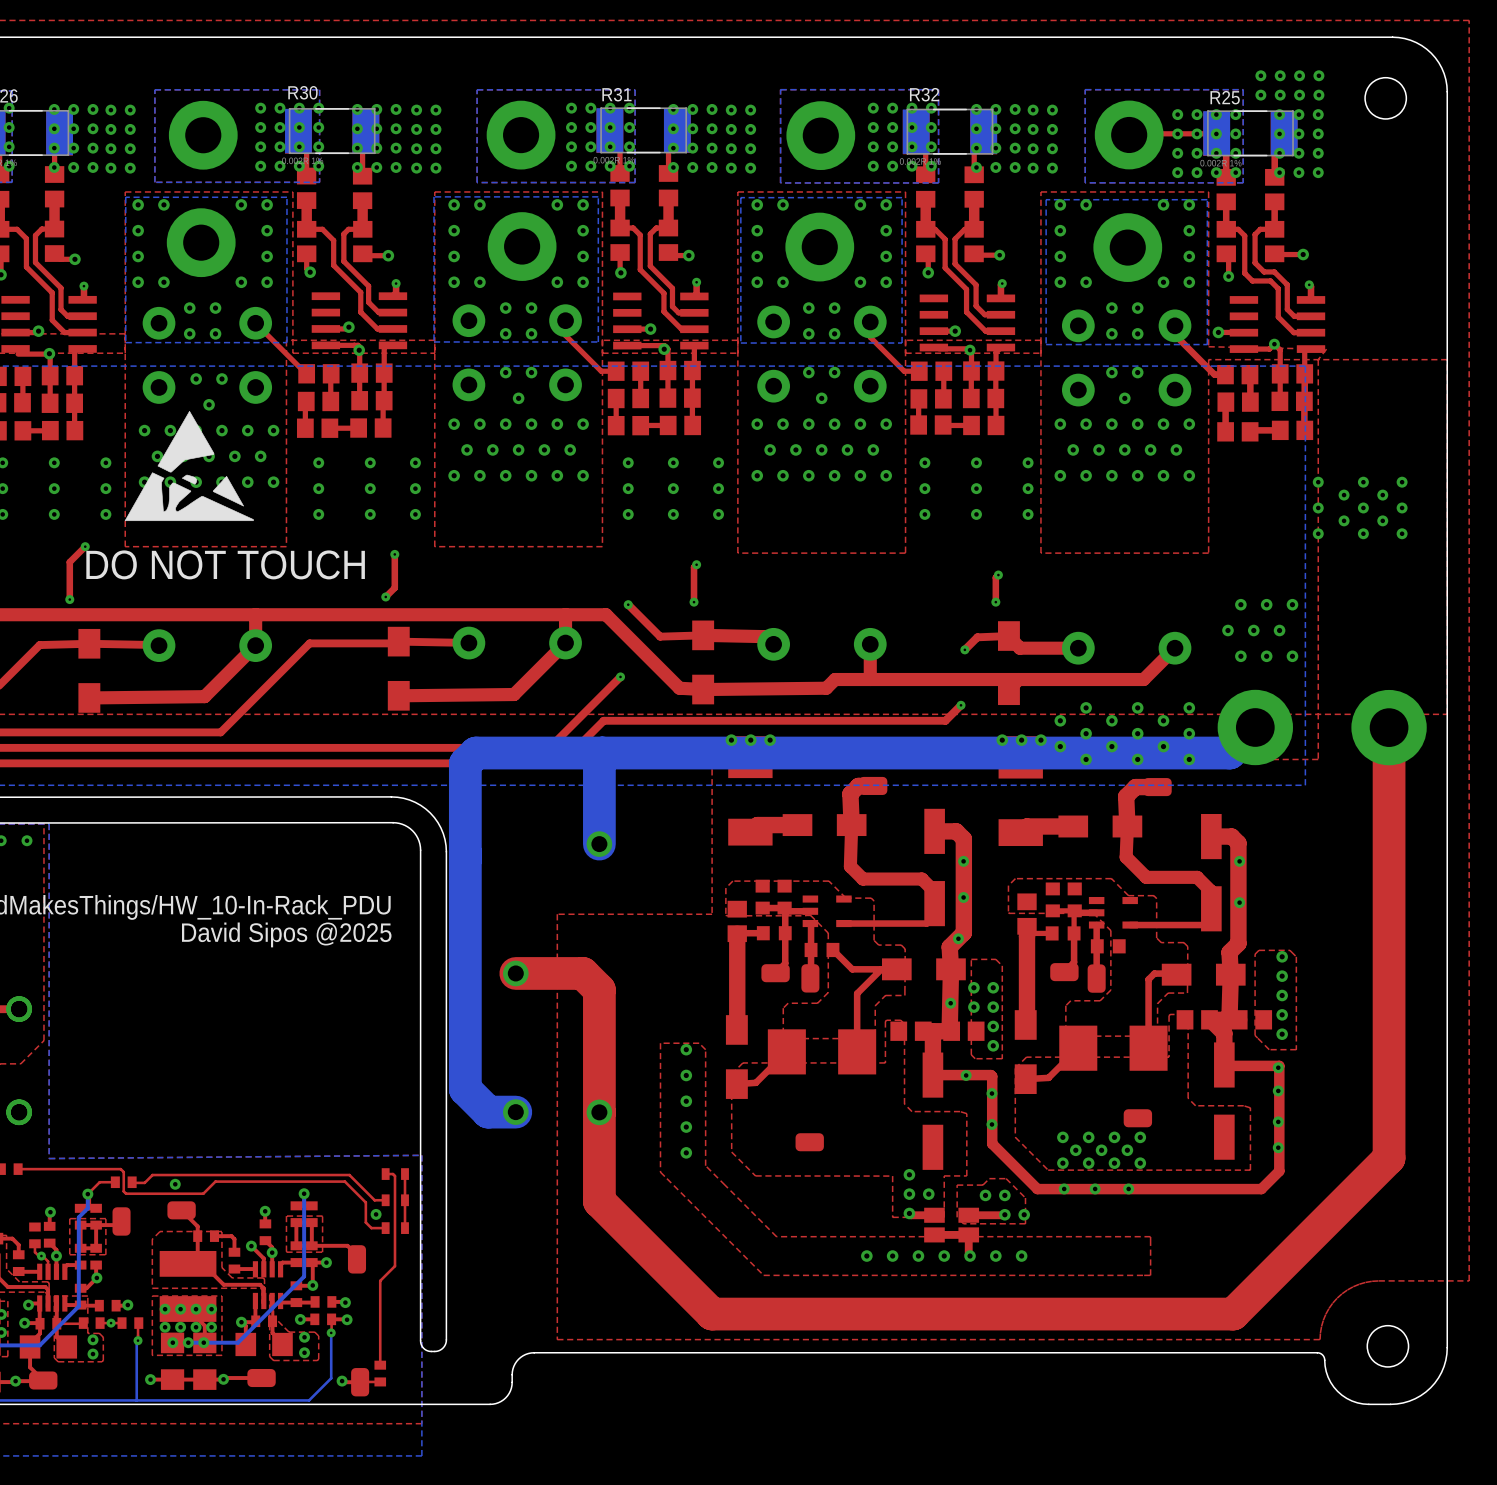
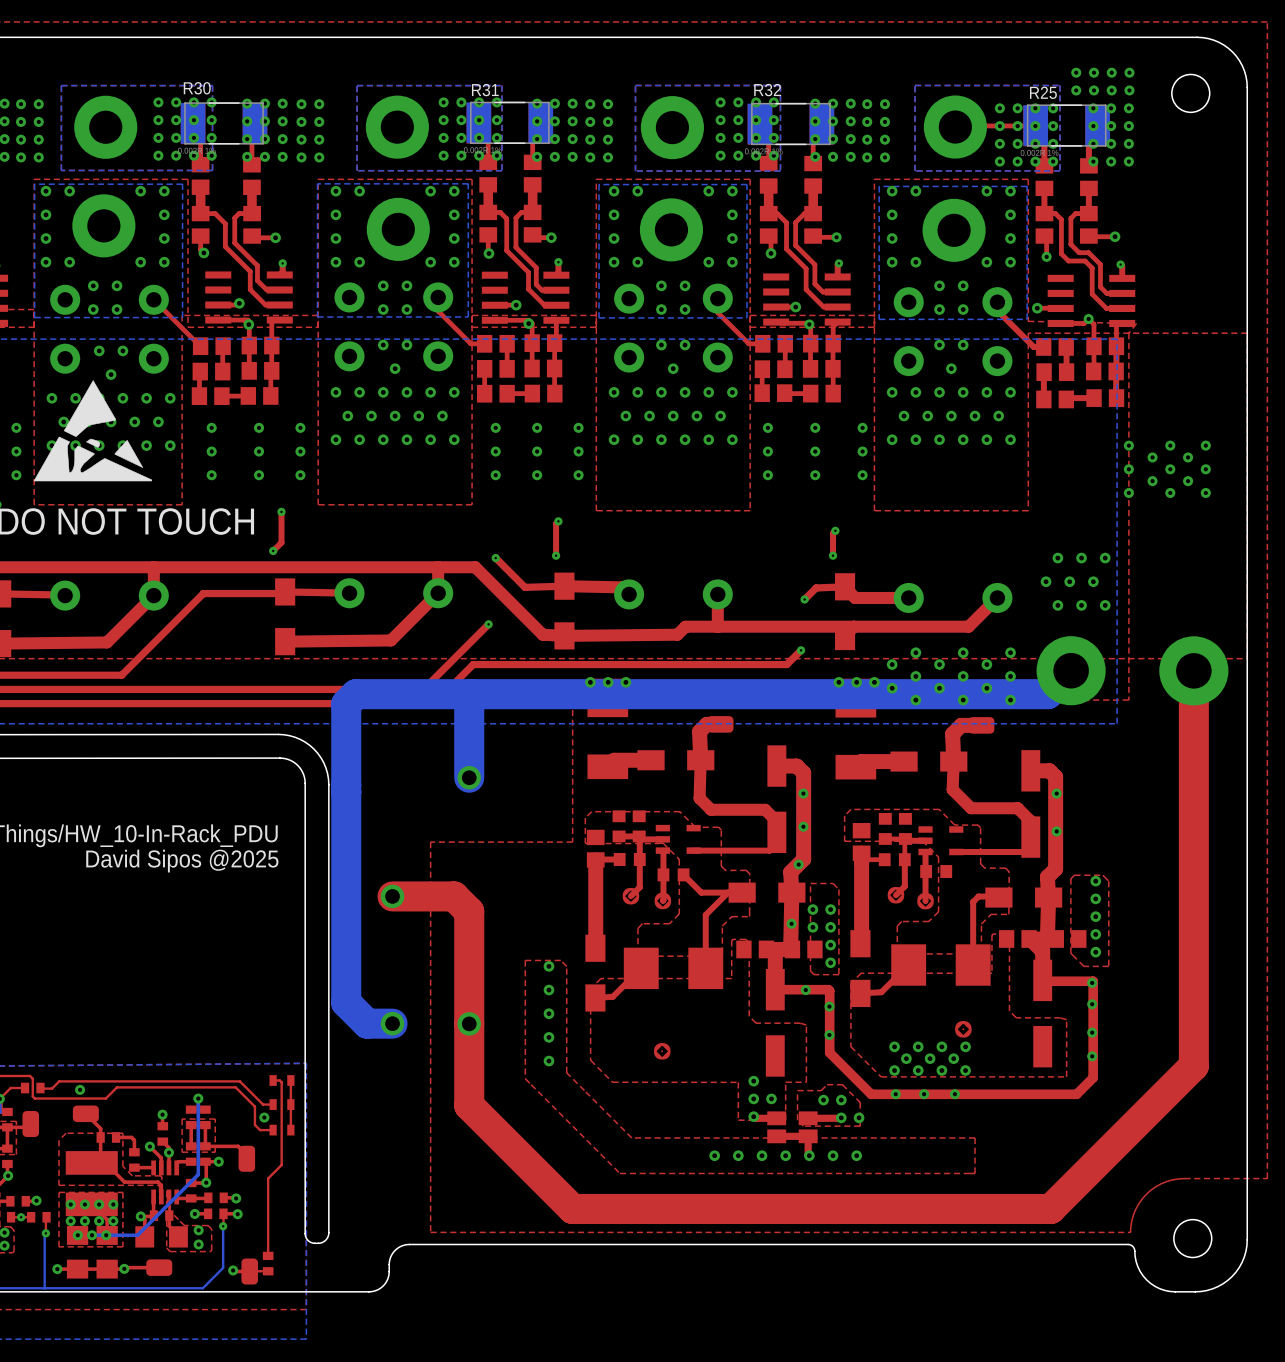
part footprint: [1050, 963, 1079, 982] -> [887, 886, 905, 904]
part footprint: [761, 964, 790, 983] -> [622, 887, 640, 905]
part footprint: [801, 964, 820, 993] -> [654, 892, 672, 910]
part footprint: [1087, 964, 1106, 993] -> [917, 892, 934, 910]
part footprint: [1123, 1109, 1153, 1128] -> [955, 1021, 972, 1038]
part footprint: [795, 1133, 824, 1152] -> [653, 1043, 671, 1060]

